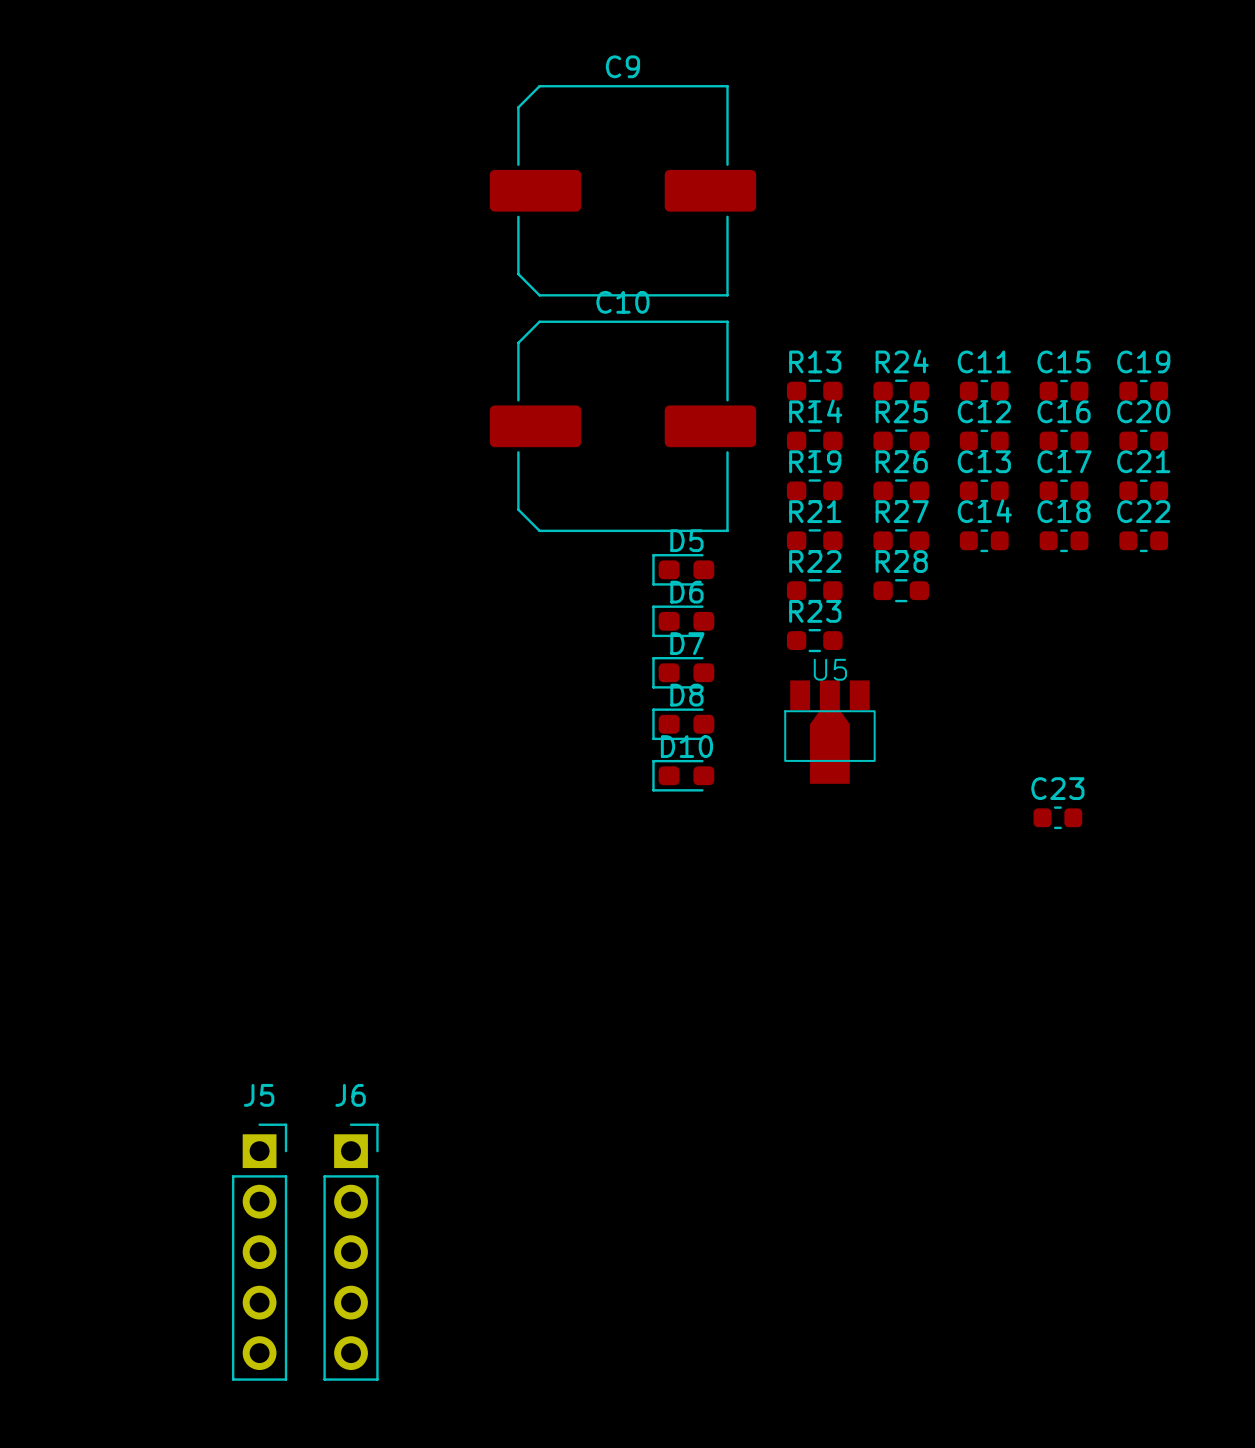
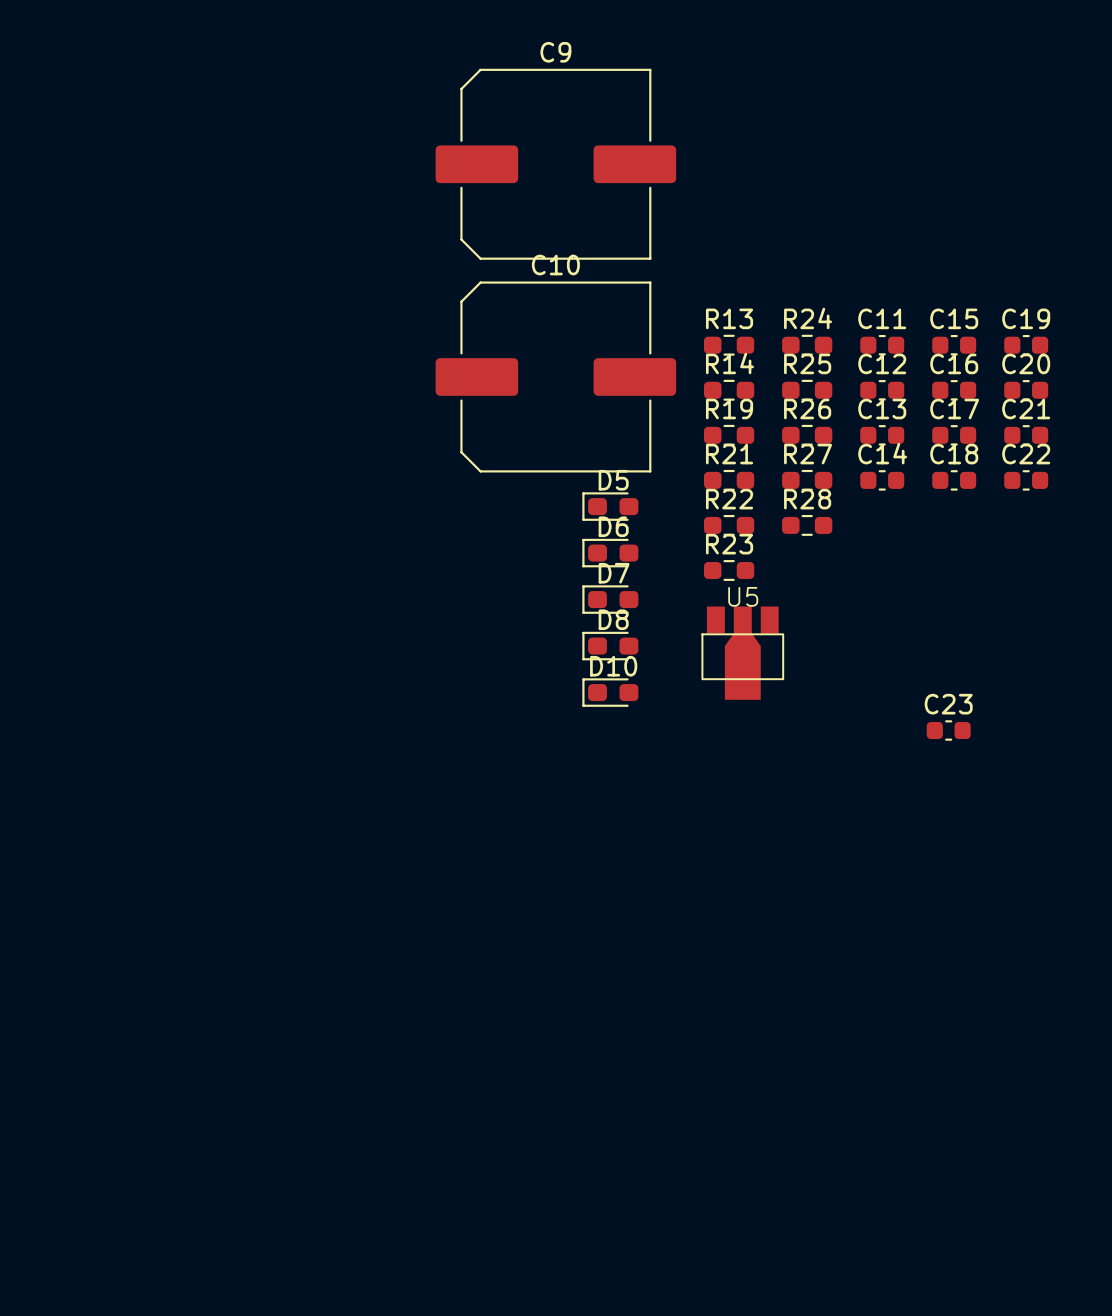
J5: (259, 1252) -> none
J6: (351, 1252) -> none

